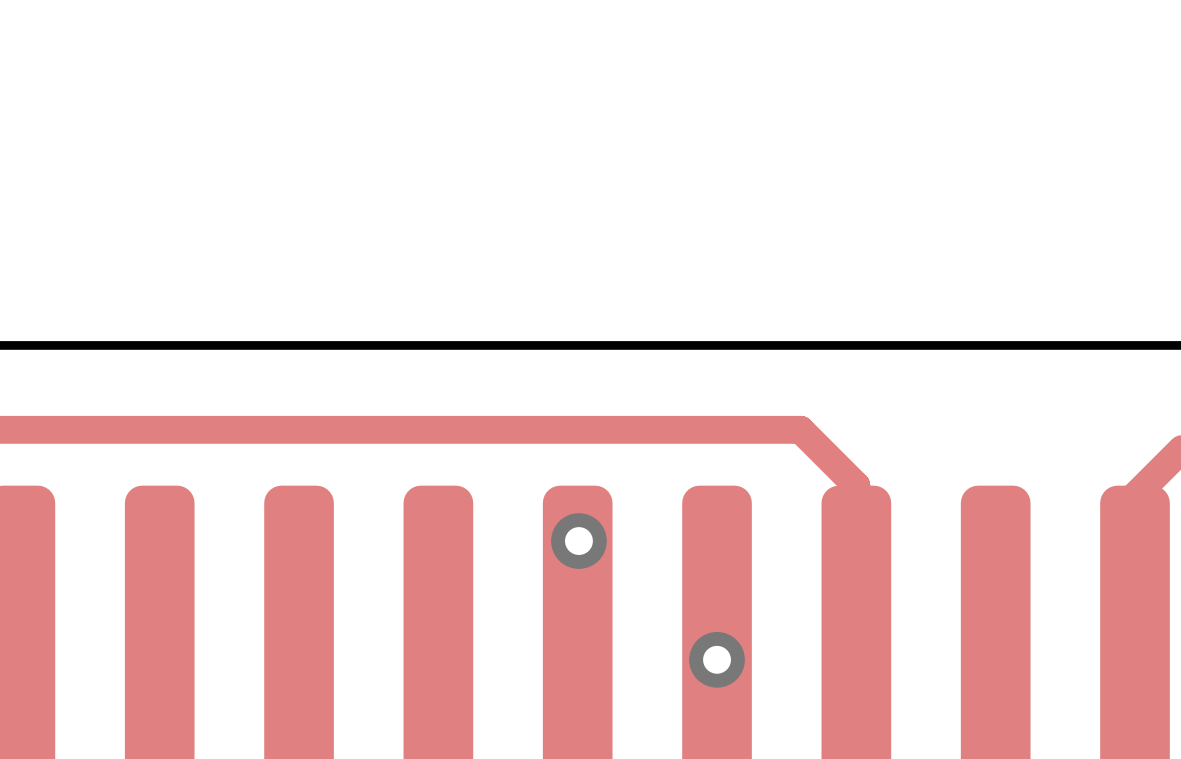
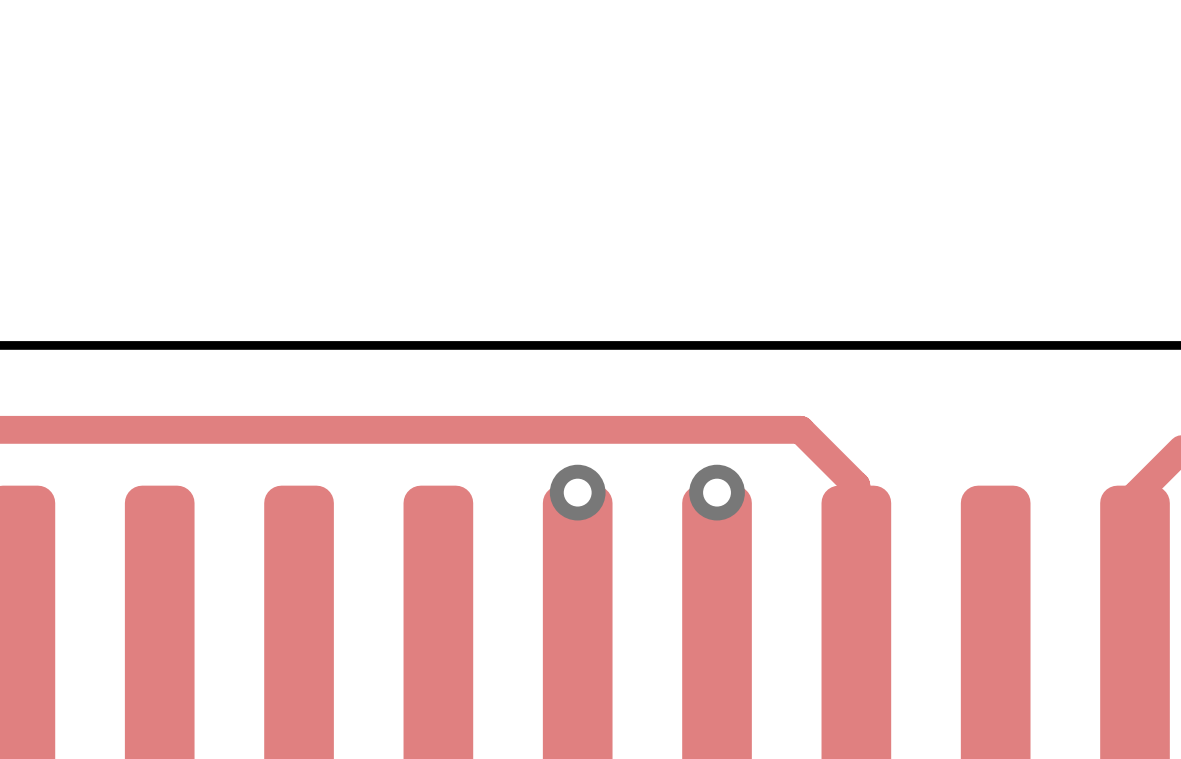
via: none -> (717, 492)
via position: (578, 541) -> (577, 492)
via: (717, 659) -> none

